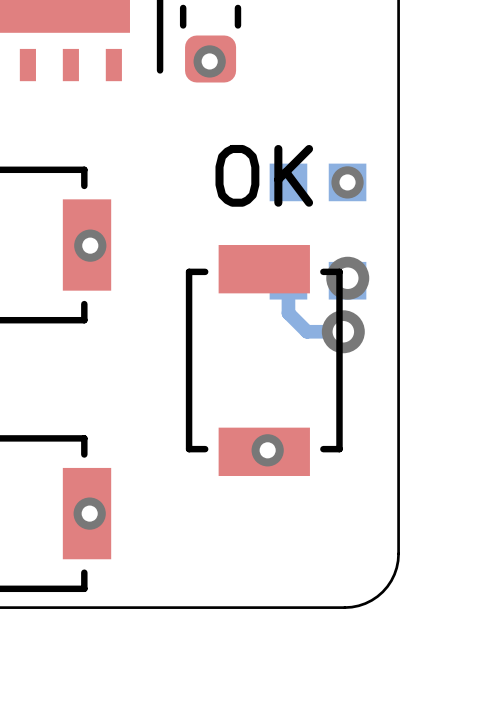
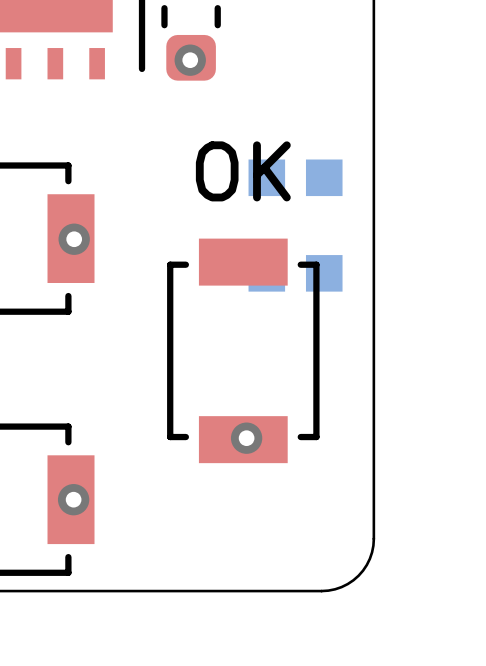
via: (347, 182) -> none
via: (347, 278) -> none
bottom track: (288, 280) (288, 313) (307, 331) (343, 331) -> none
via: (343, 331) -> none

